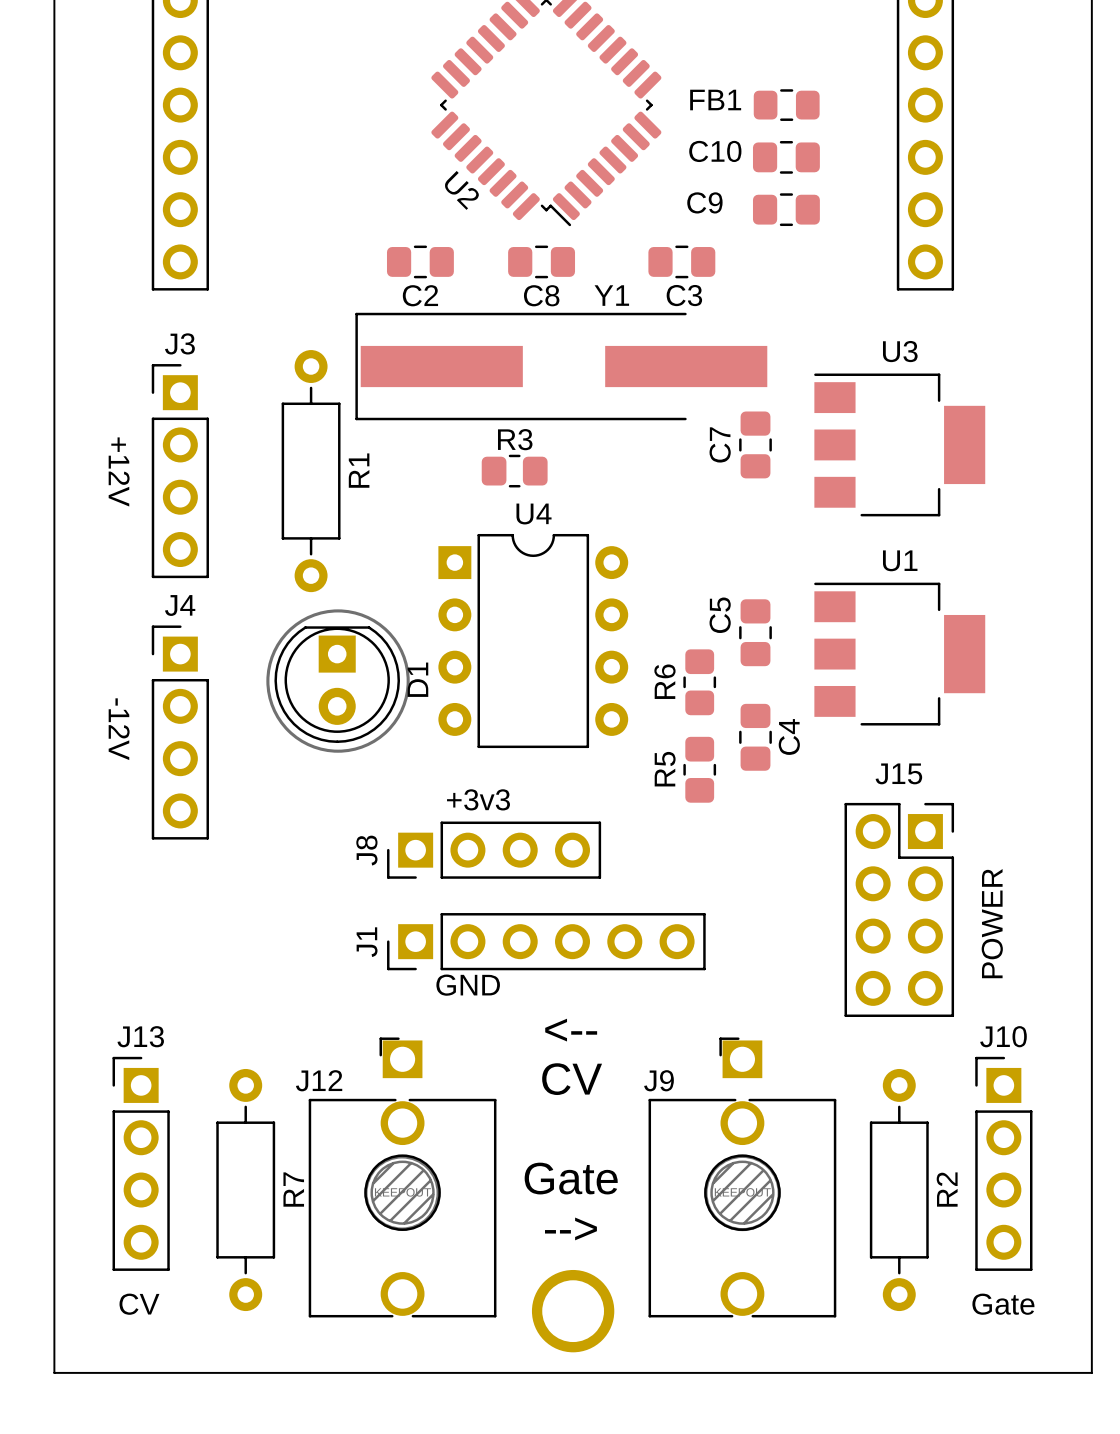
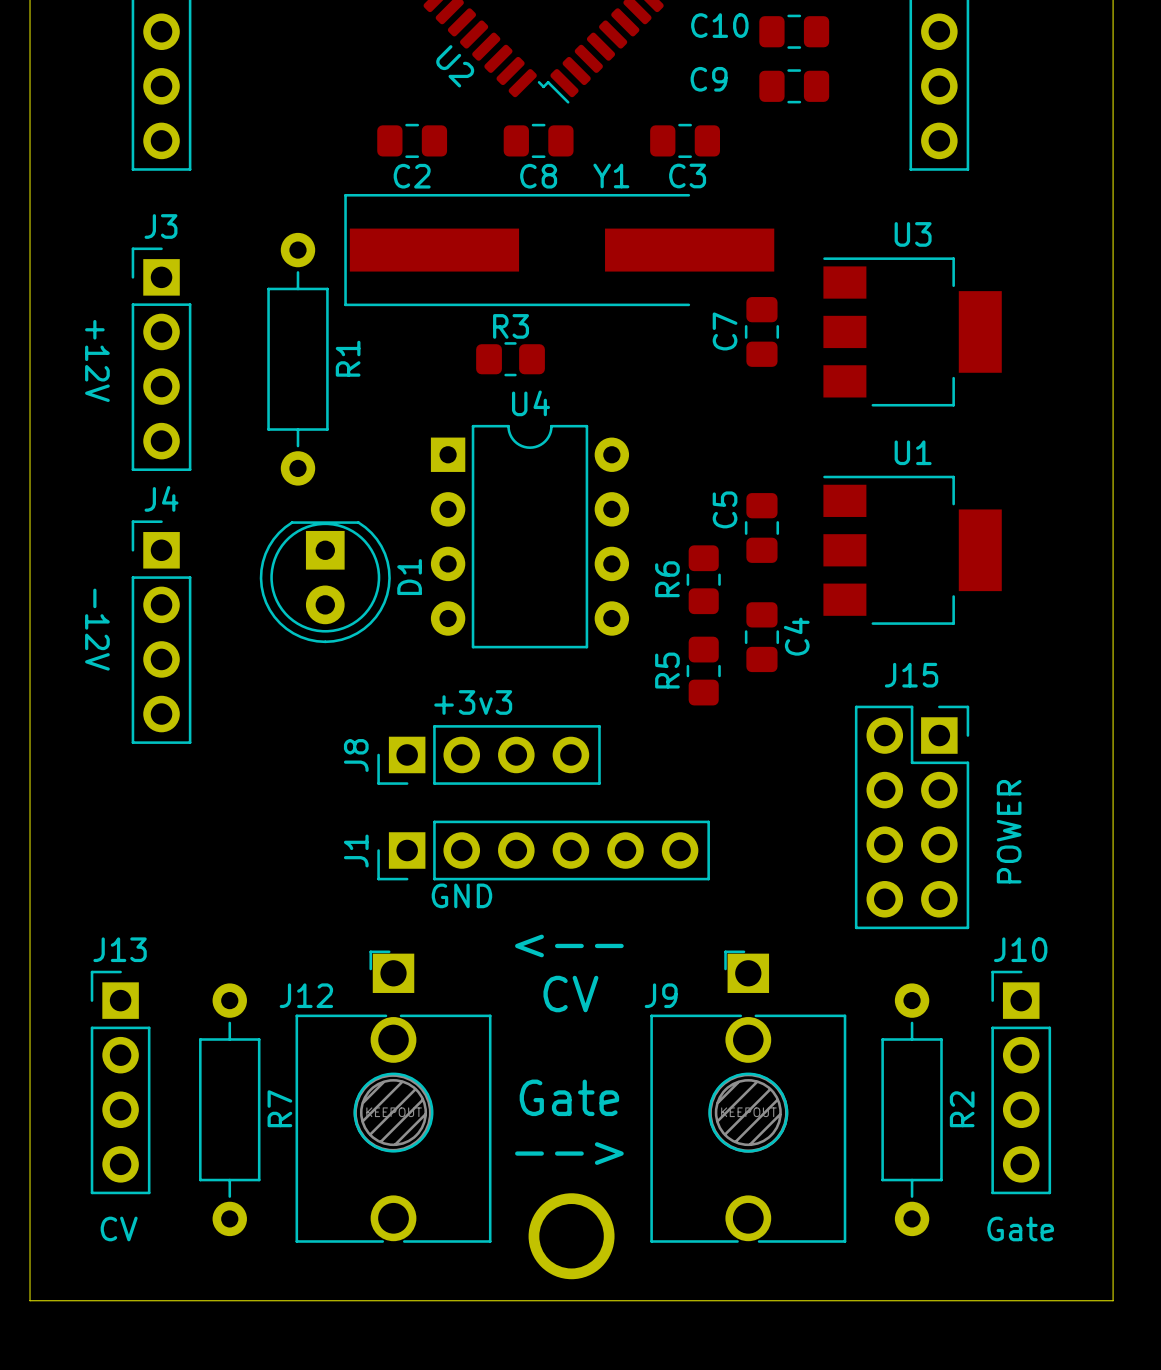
drawing: [266, 609, 410, 753] -> none

